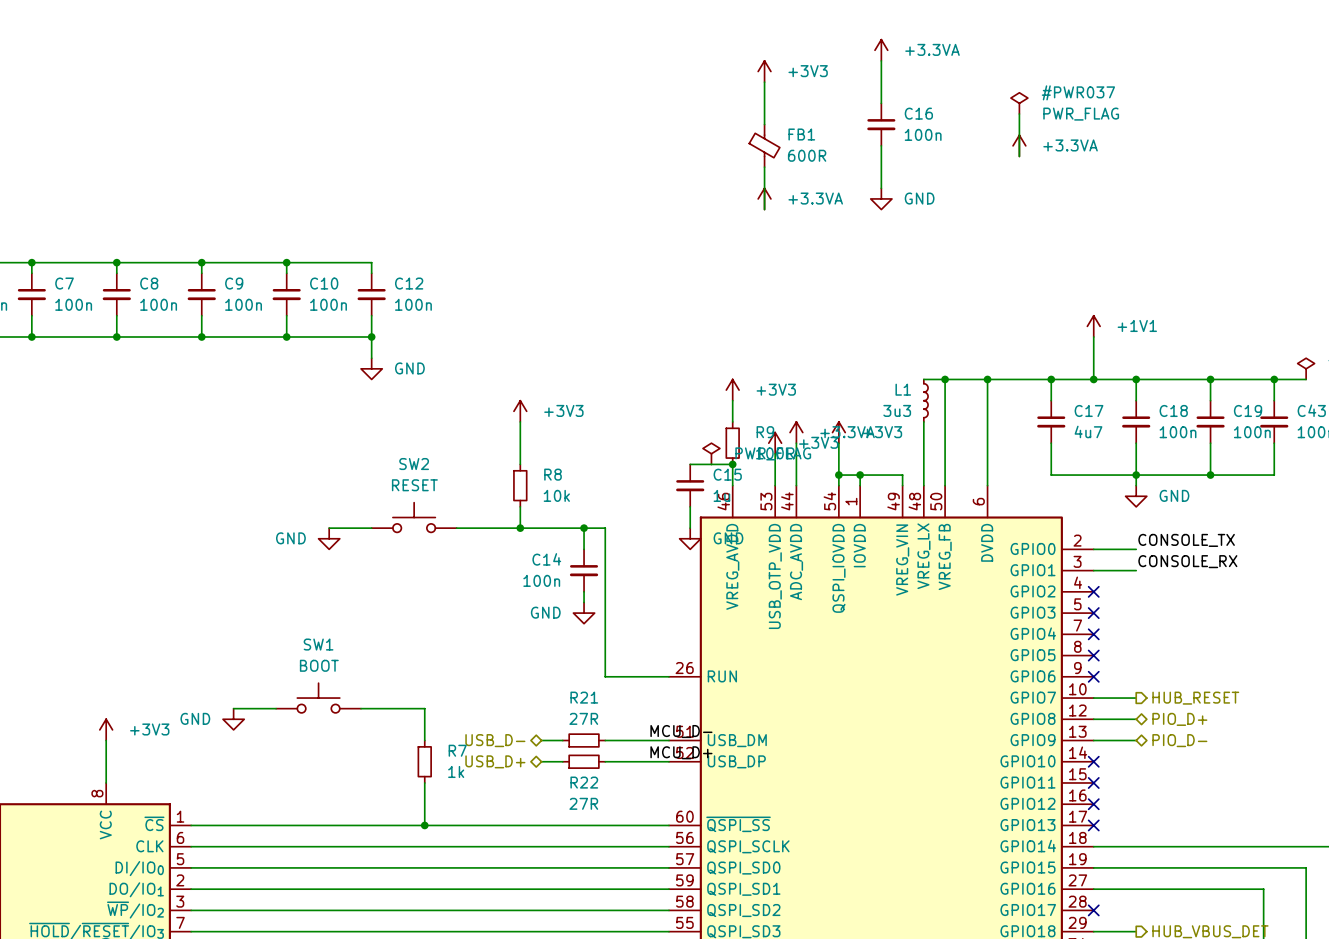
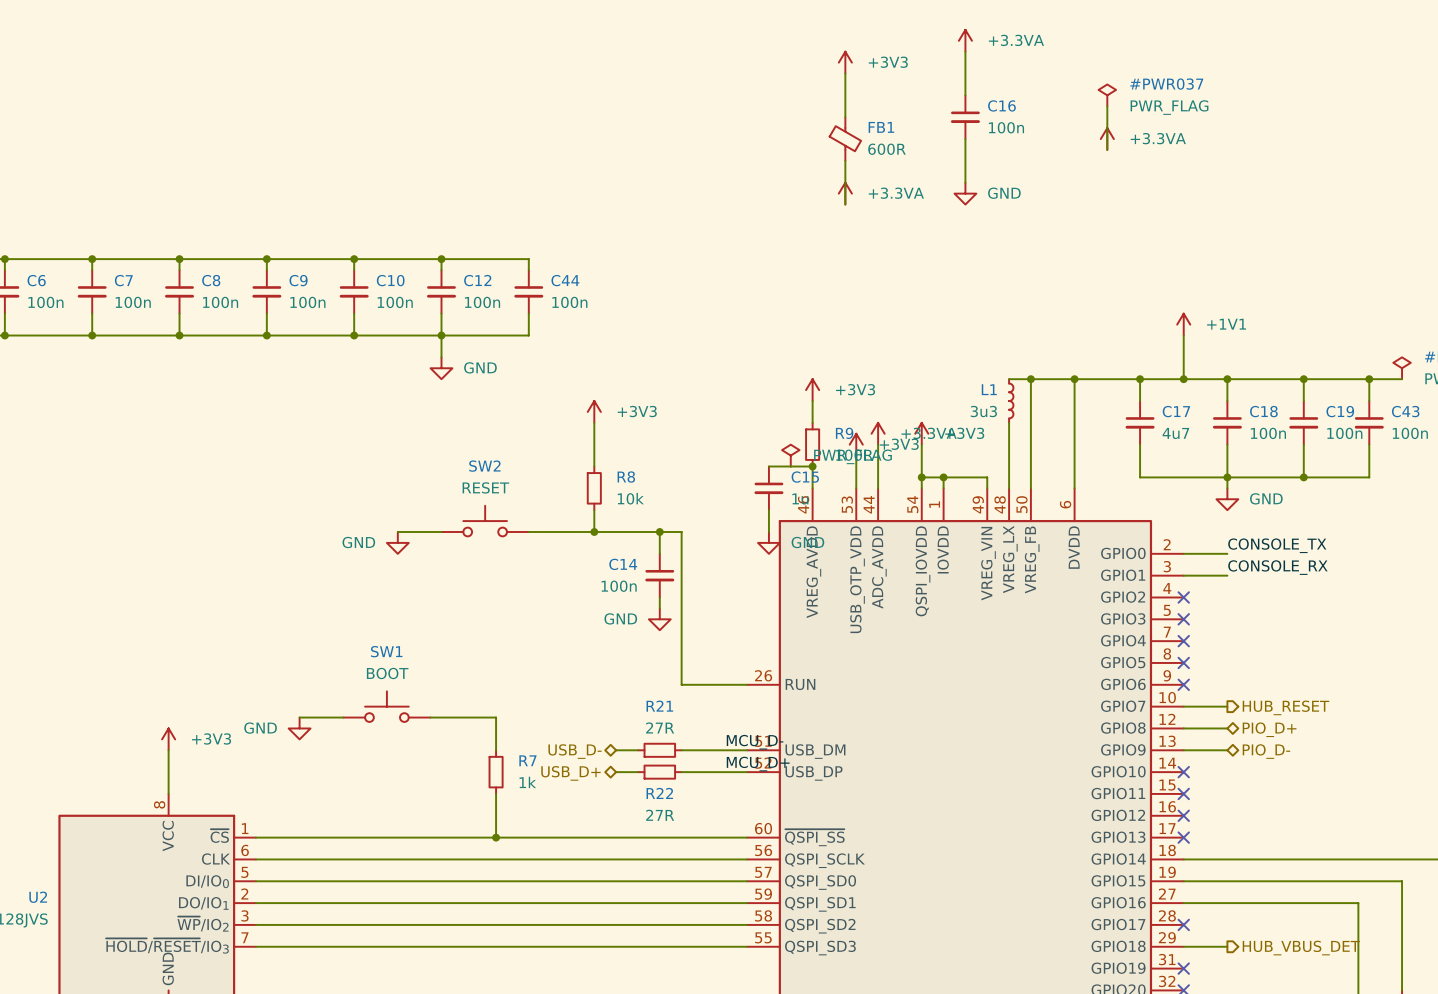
wire: none -> (441, 259) (528, 259) (528, 270)
junction: none -> (441, 259)
C44: none -> 100n (528, 291)
wire: none -> (528, 313) (528, 335) (441, 335)

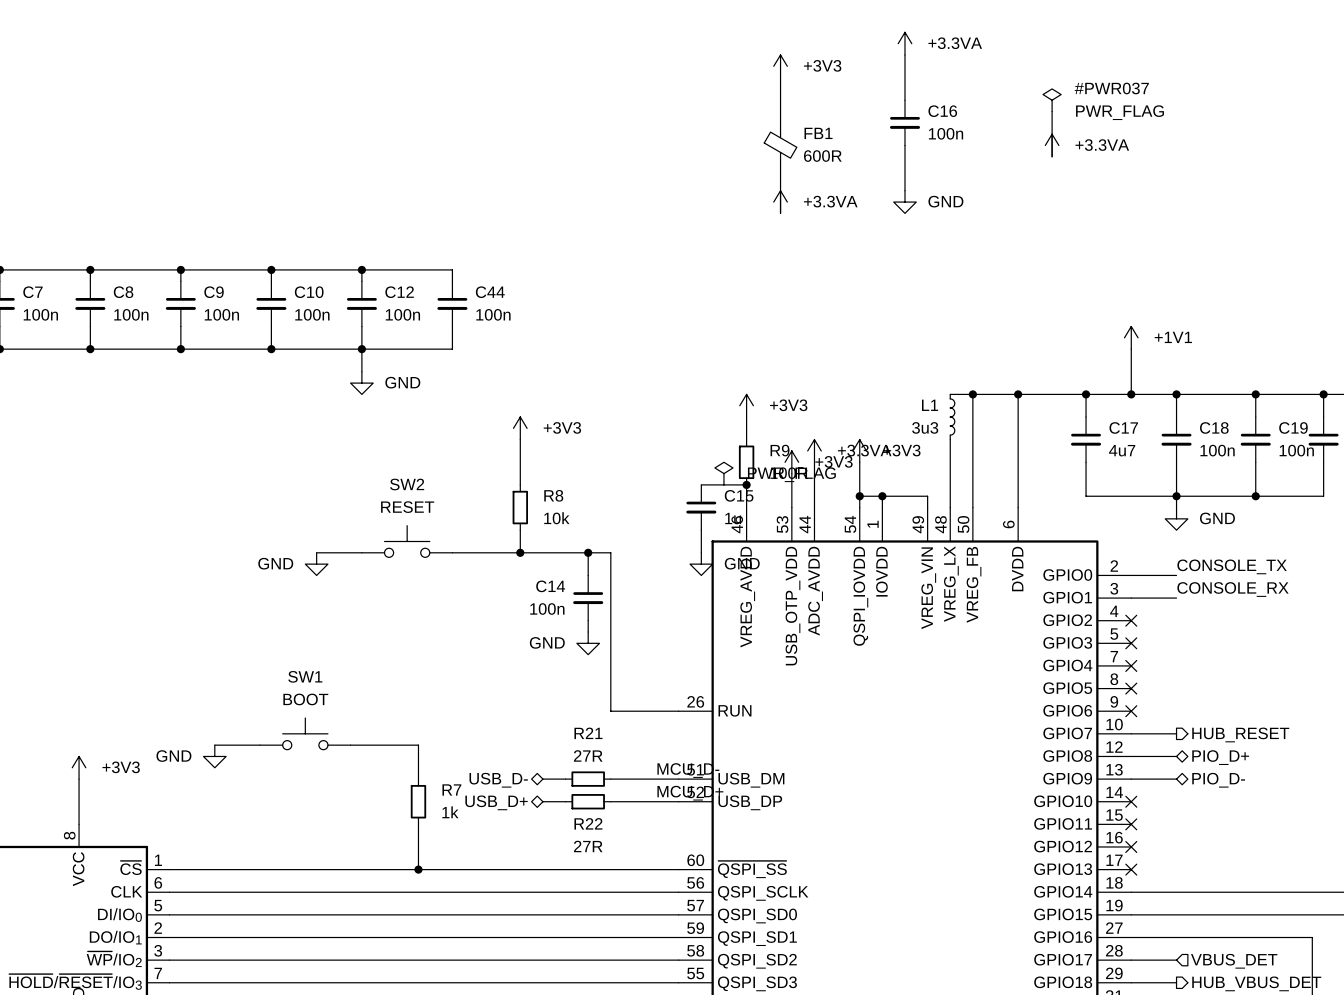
wire: none -> (1131, 960) (1176, 960)
no-connect mark: (1183, 924) -> none
hierarchical label: none -> VBUS_DET (1234, 961)

